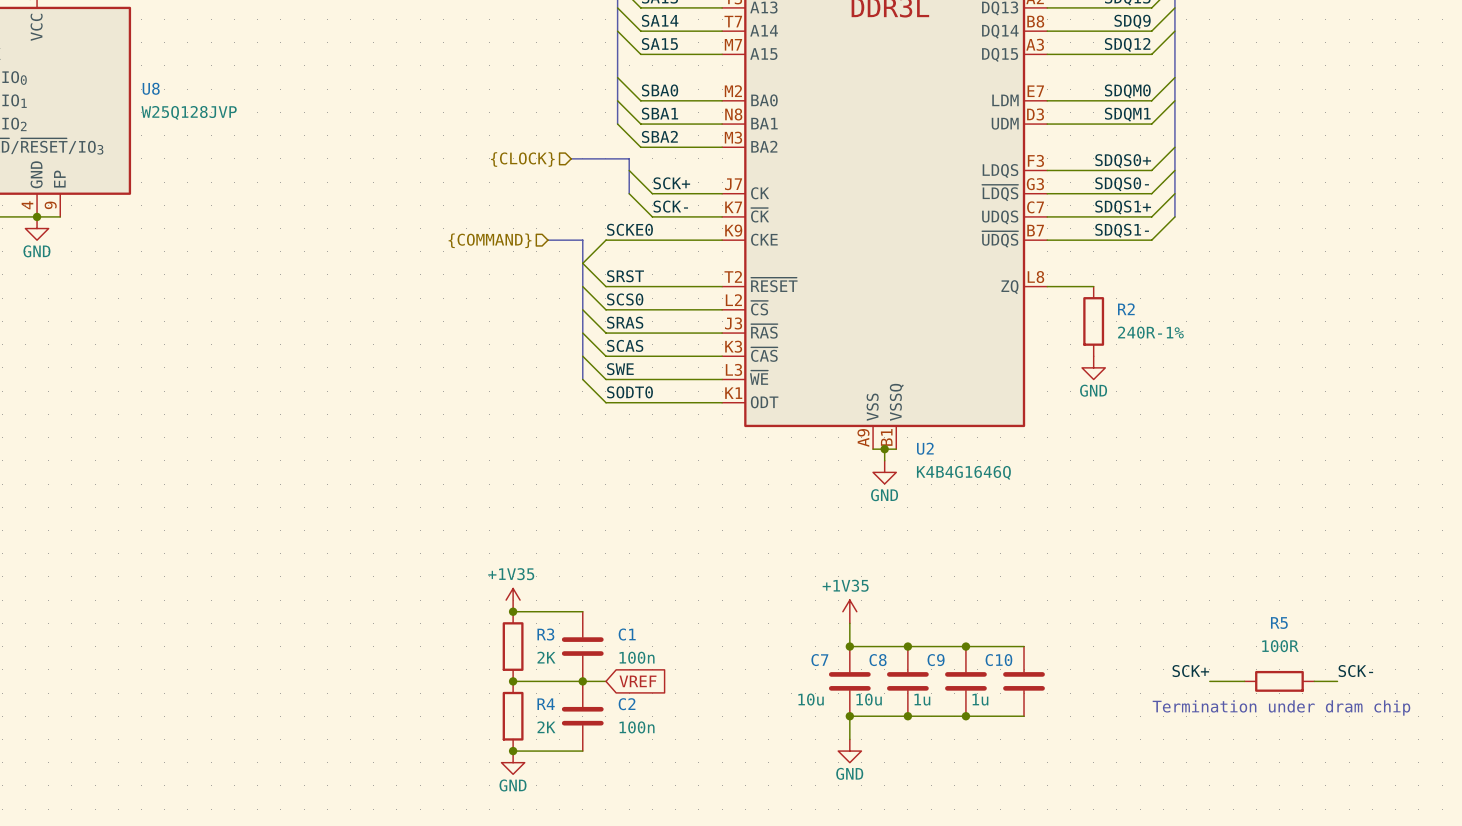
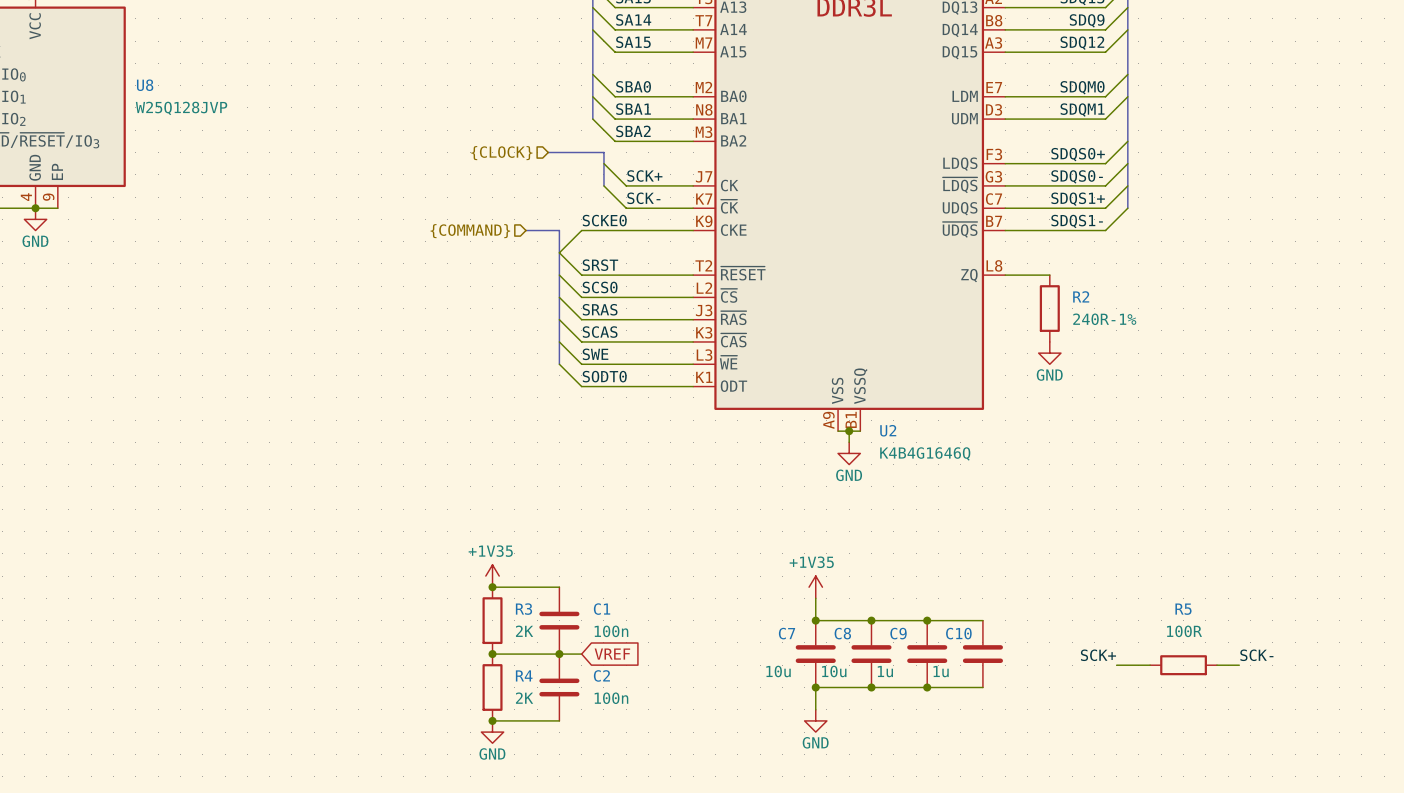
label position: SCK+ (1190, 671) -> SCK+ (1098, 655)
label position: SCK- (1355, 671) -> SCK- (1256, 655)
wire: (1209, 681) (1244, 681) -> (1116, 665) (1150, 665)
R5 position: (1279, 681) -> (1183, 665)
wire: (1314, 681) (1337, 681) -> (1217, 665) (1239, 665)
text: Termination under dram chip (1281, 707) -> none

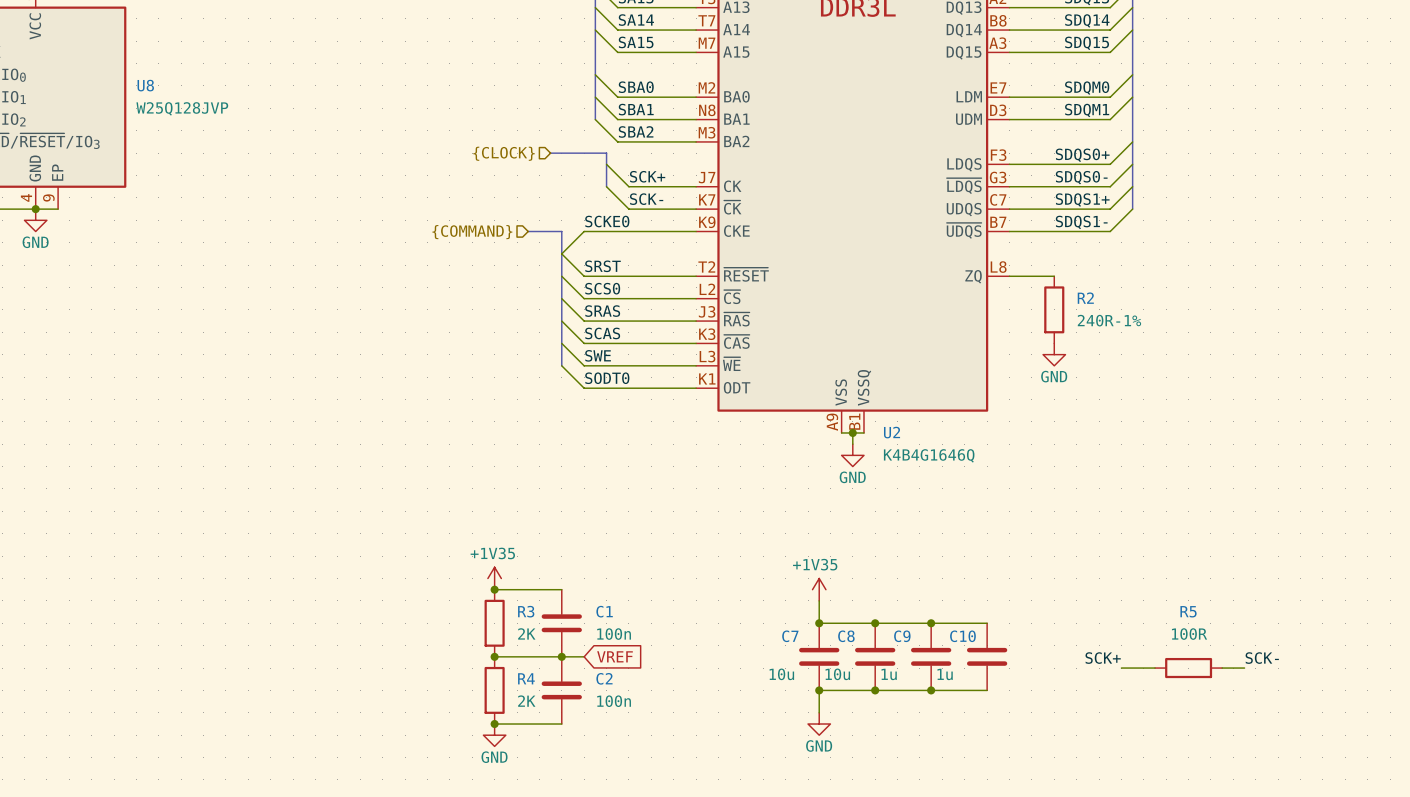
label: SDQ9 (1087, 20) -> SDQ14 (1087, 20)
label: SDQ12 (1082, 43) -> SDQ15 (1087, 43)

